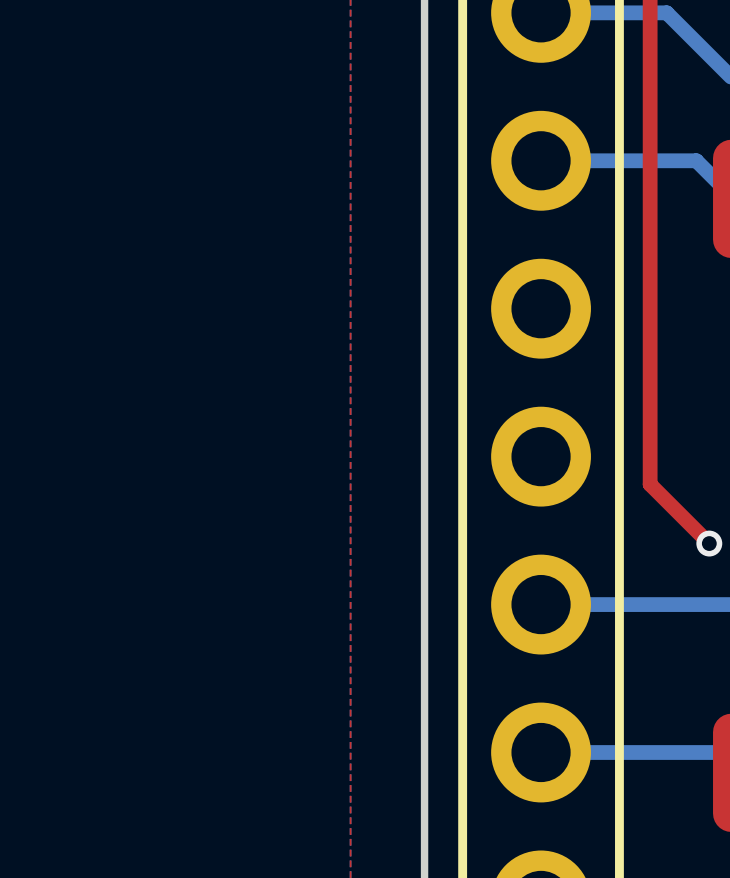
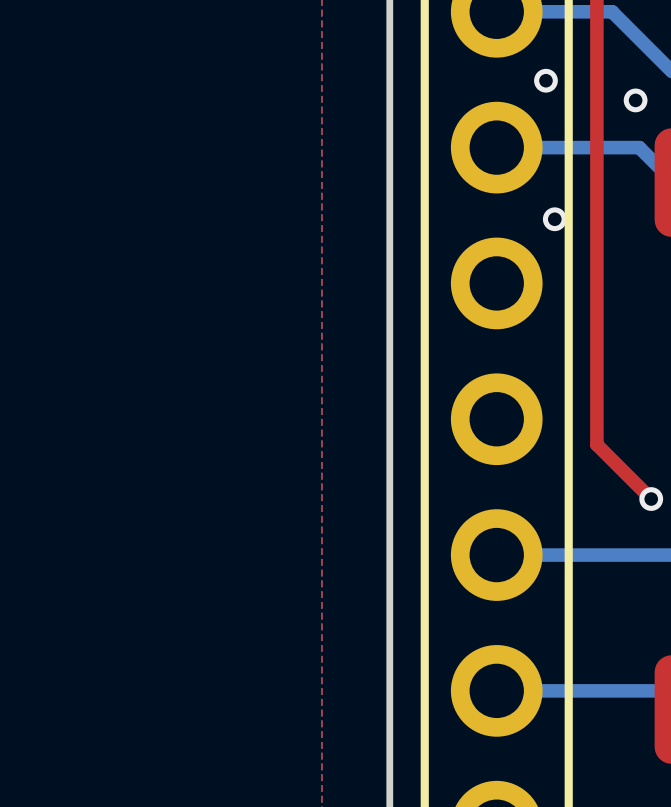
via: none -> (545, 80)
via: none -> (635, 100)
via: none -> (554, 219)

